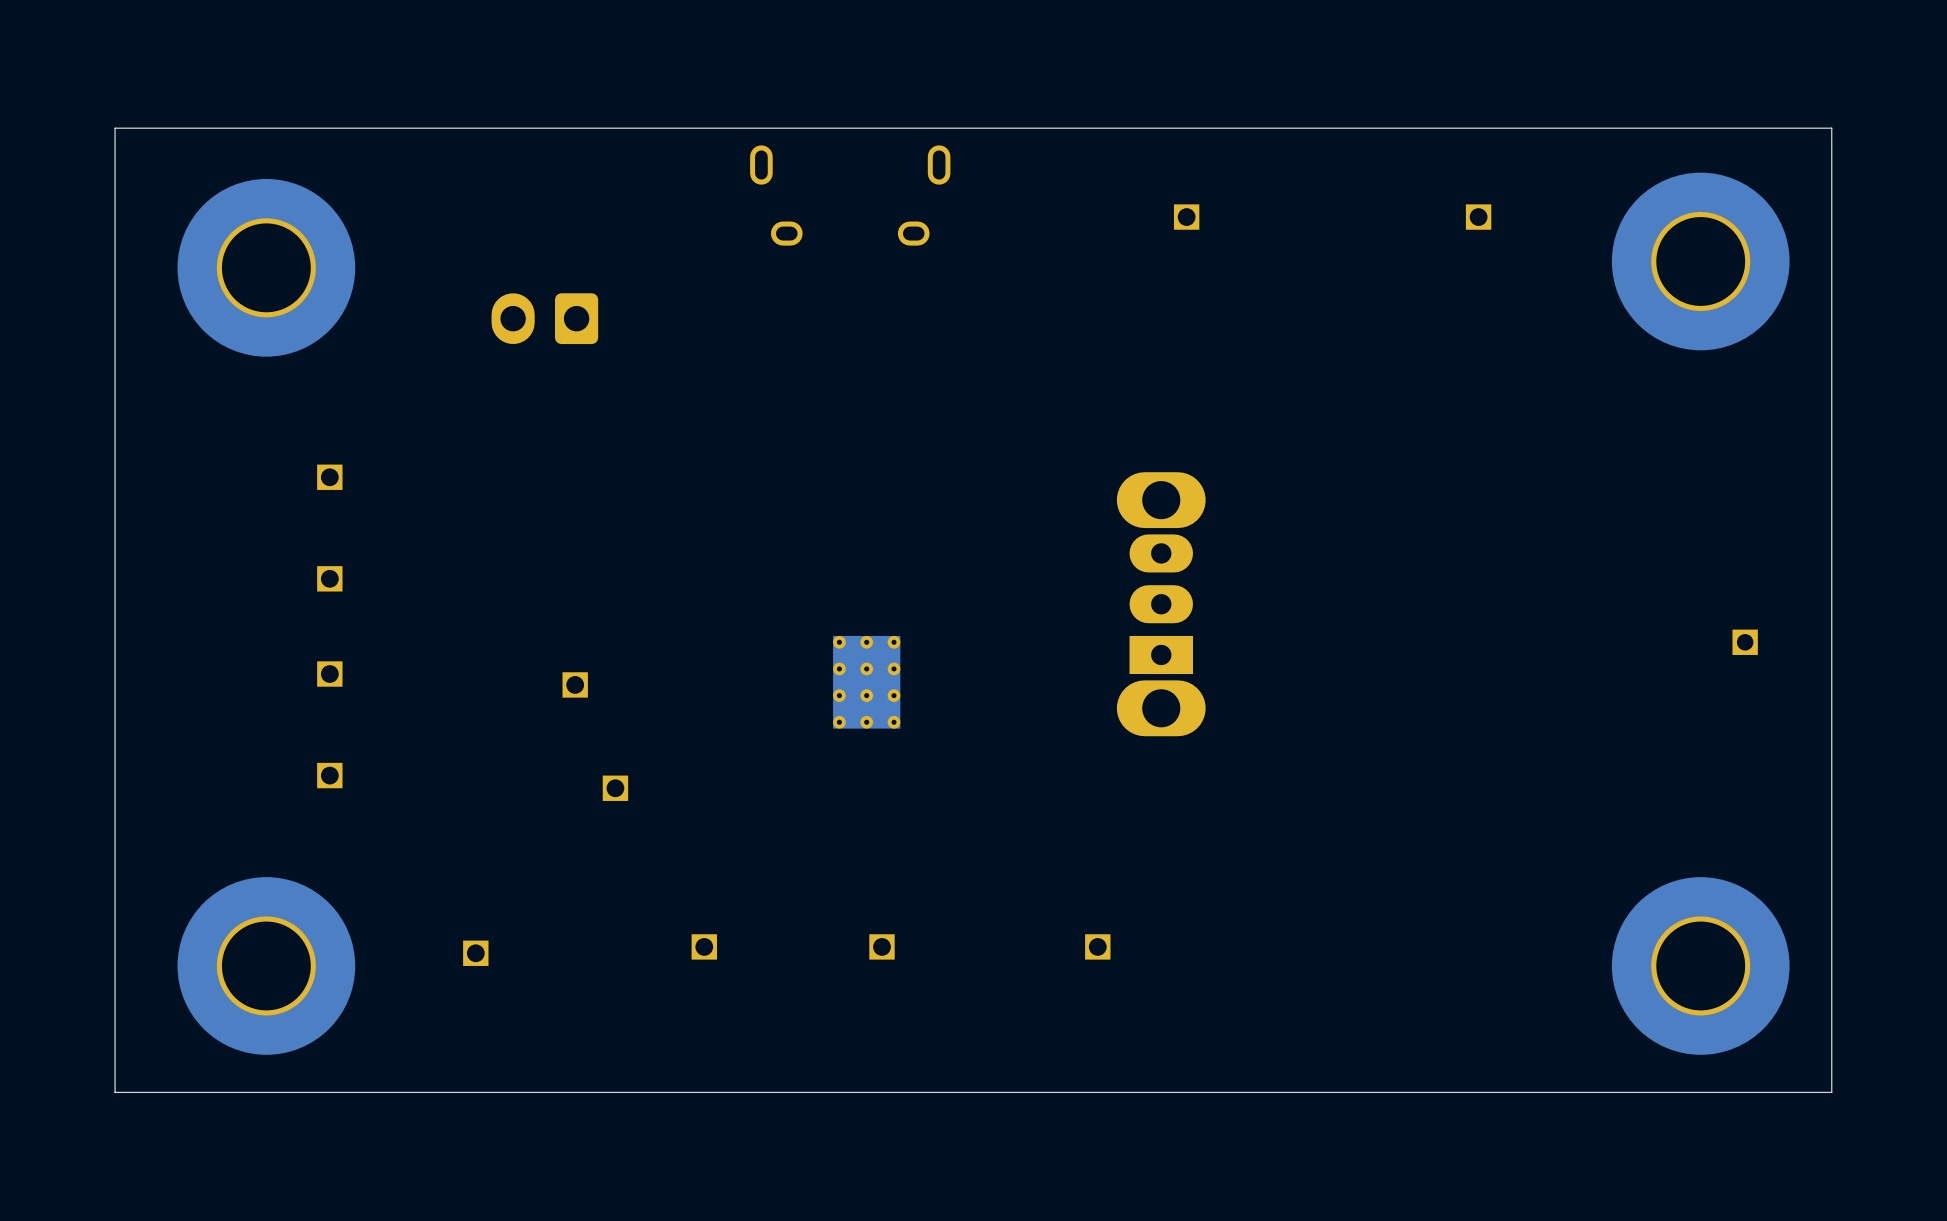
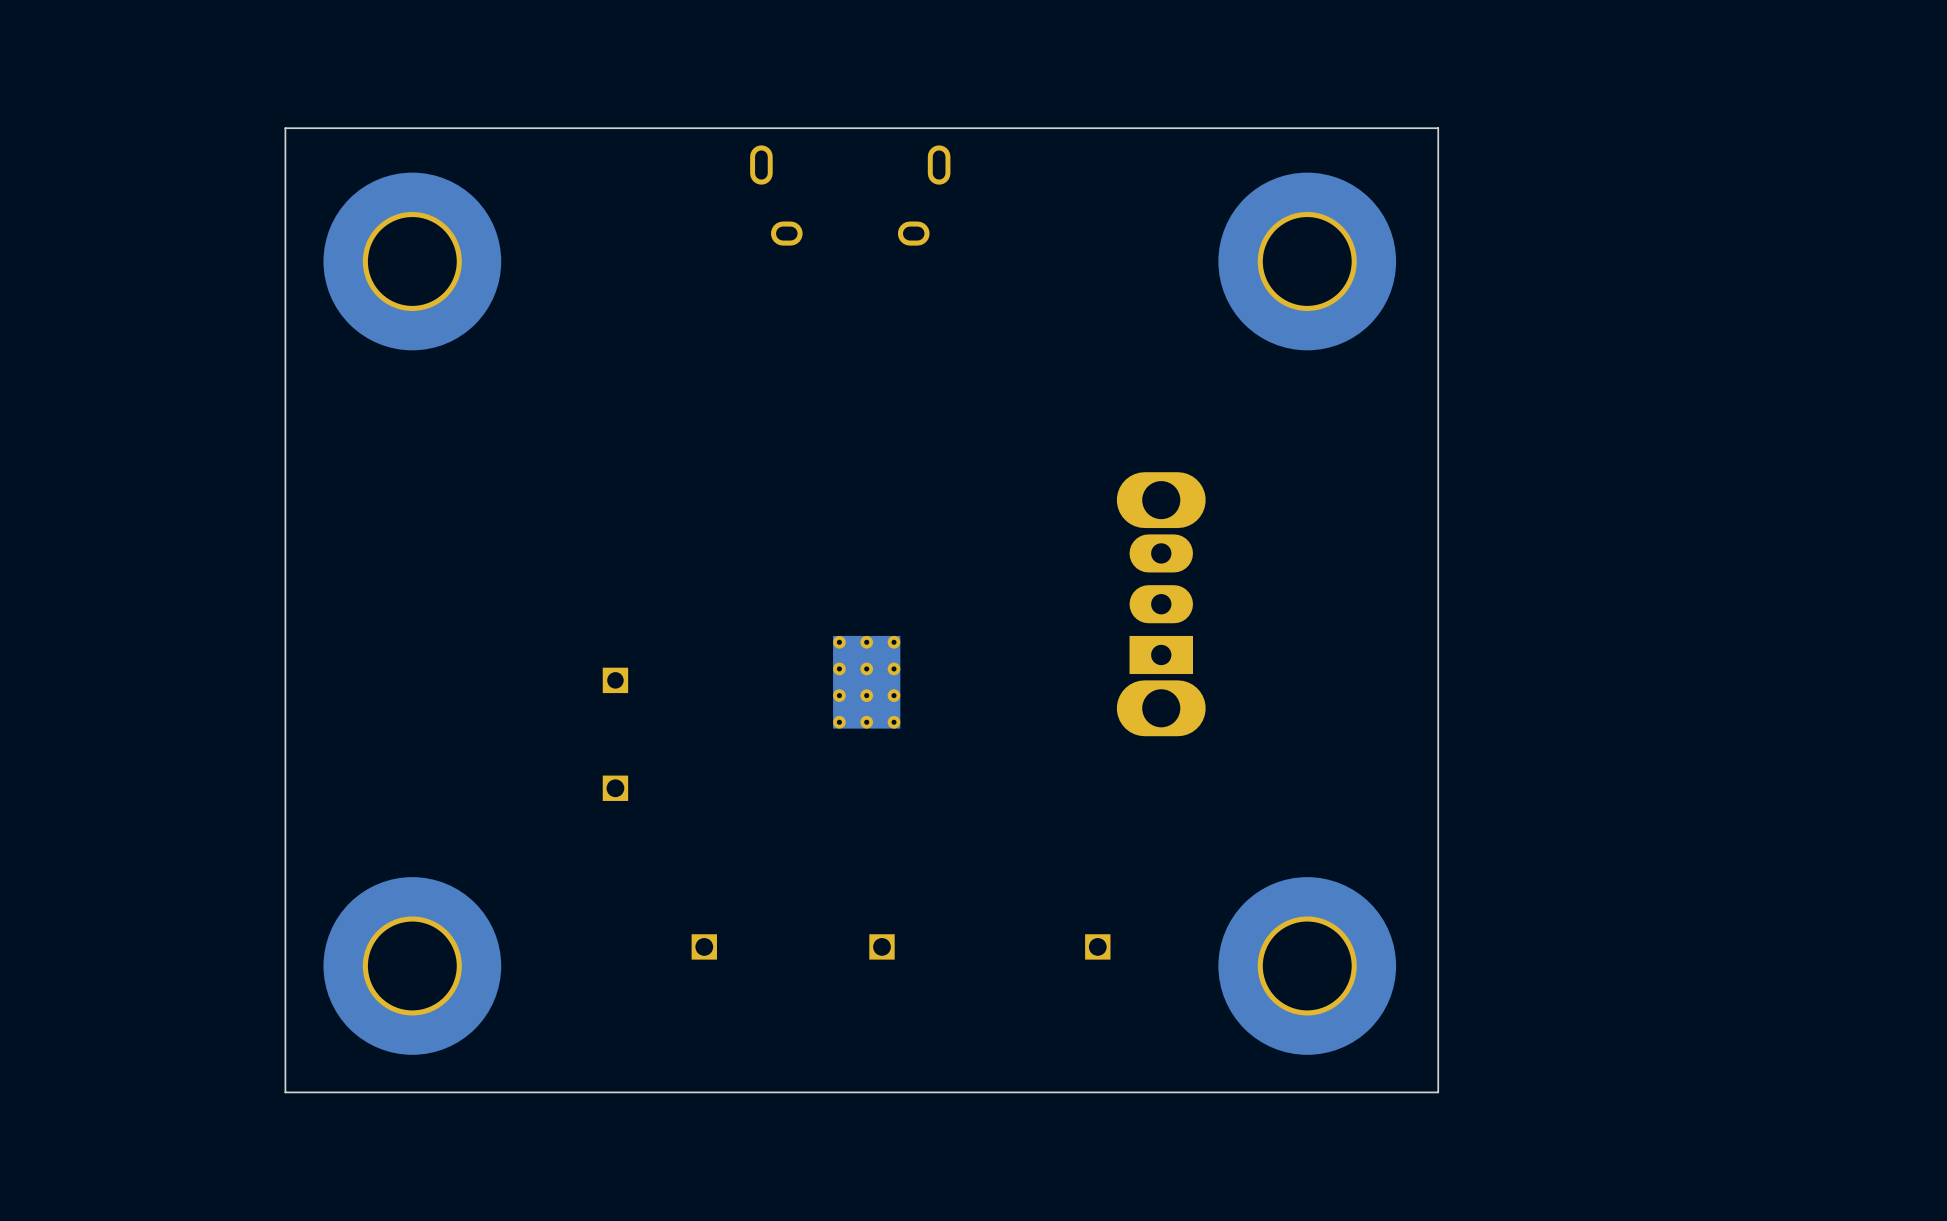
board edge: (285, 128) (115, 128) (115, 1092) (285, 1092) -> (285, 128) (285, 1092)
board edge: (1438, 128) (1831, 128) (1831, 1092) (1438, 1092) -> (1438, 128) (1438, 1092)
part: (1186, 217) -> none
part: (1478, 217) -> none
part position: (1700, 261) -> (1307, 261)
part position: (266, 267) -> (412, 261)
part: (544, 318) -> none
part: (329, 477) -> none
part: (329, 578) -> none
part: (1745, 642) -> none
part: (329, 674) -> none
part: none -> (615, 680)
part: (575, 684) -> none
part: (329, 775) -> none
part: (475, 953) -> none
part position: (266, 965) -> (412, 965)
part position: (1700, 965) -> (1307, 965)

